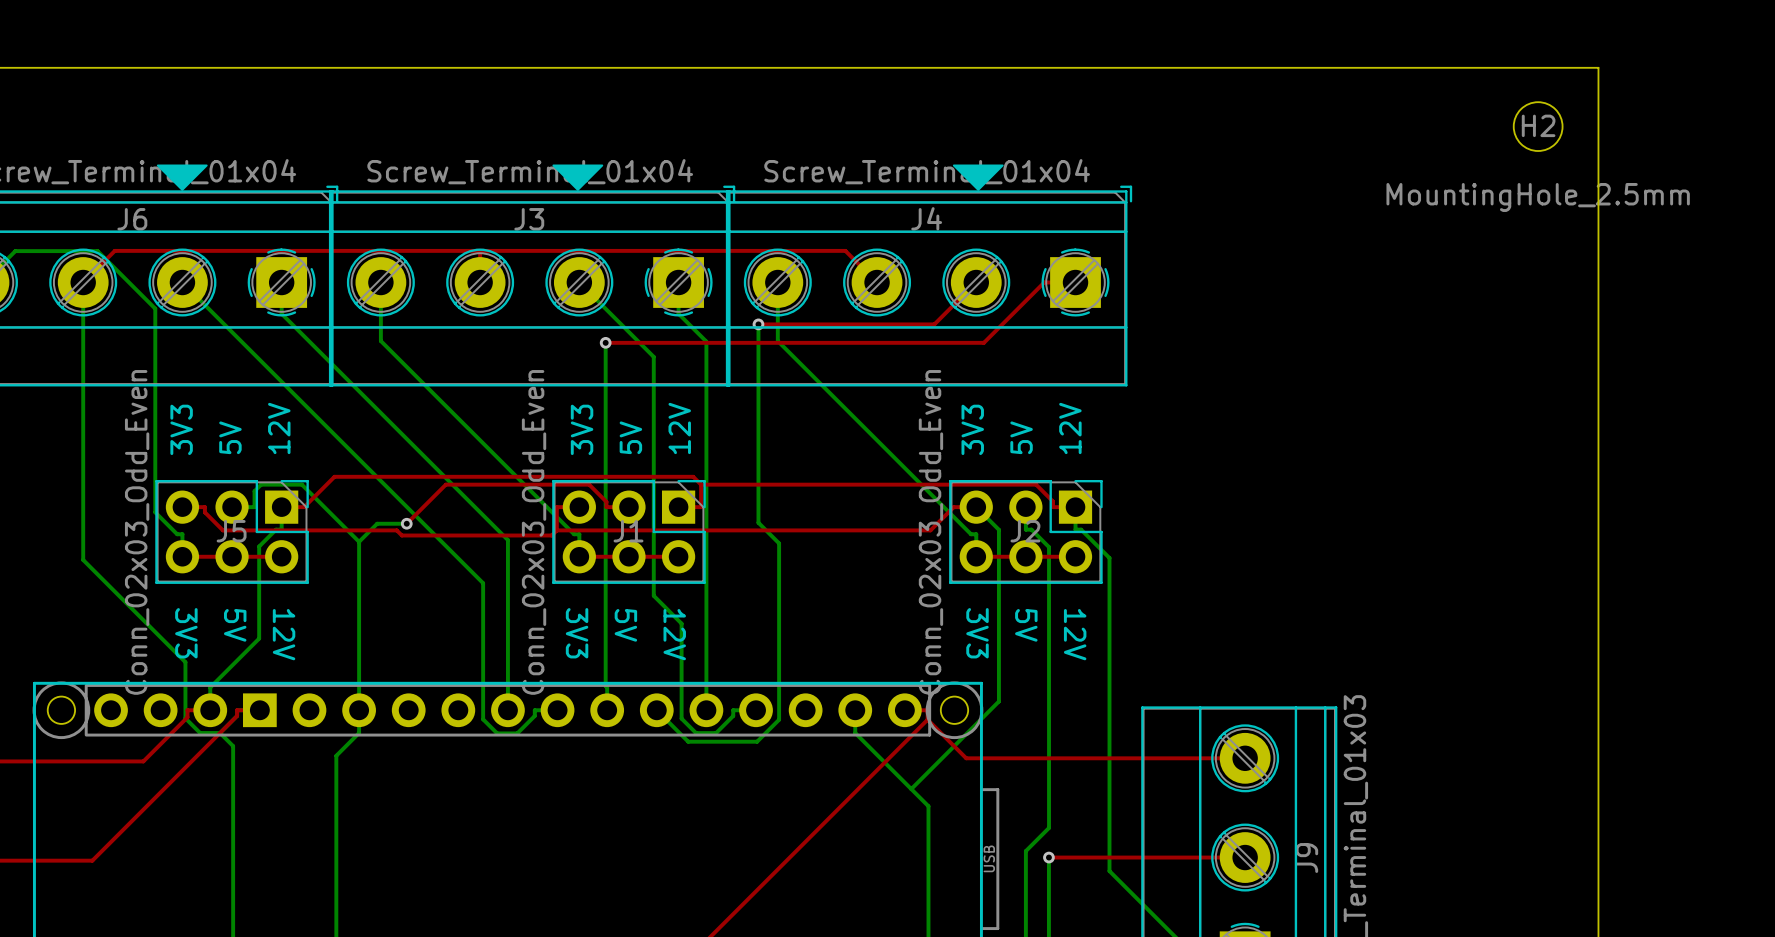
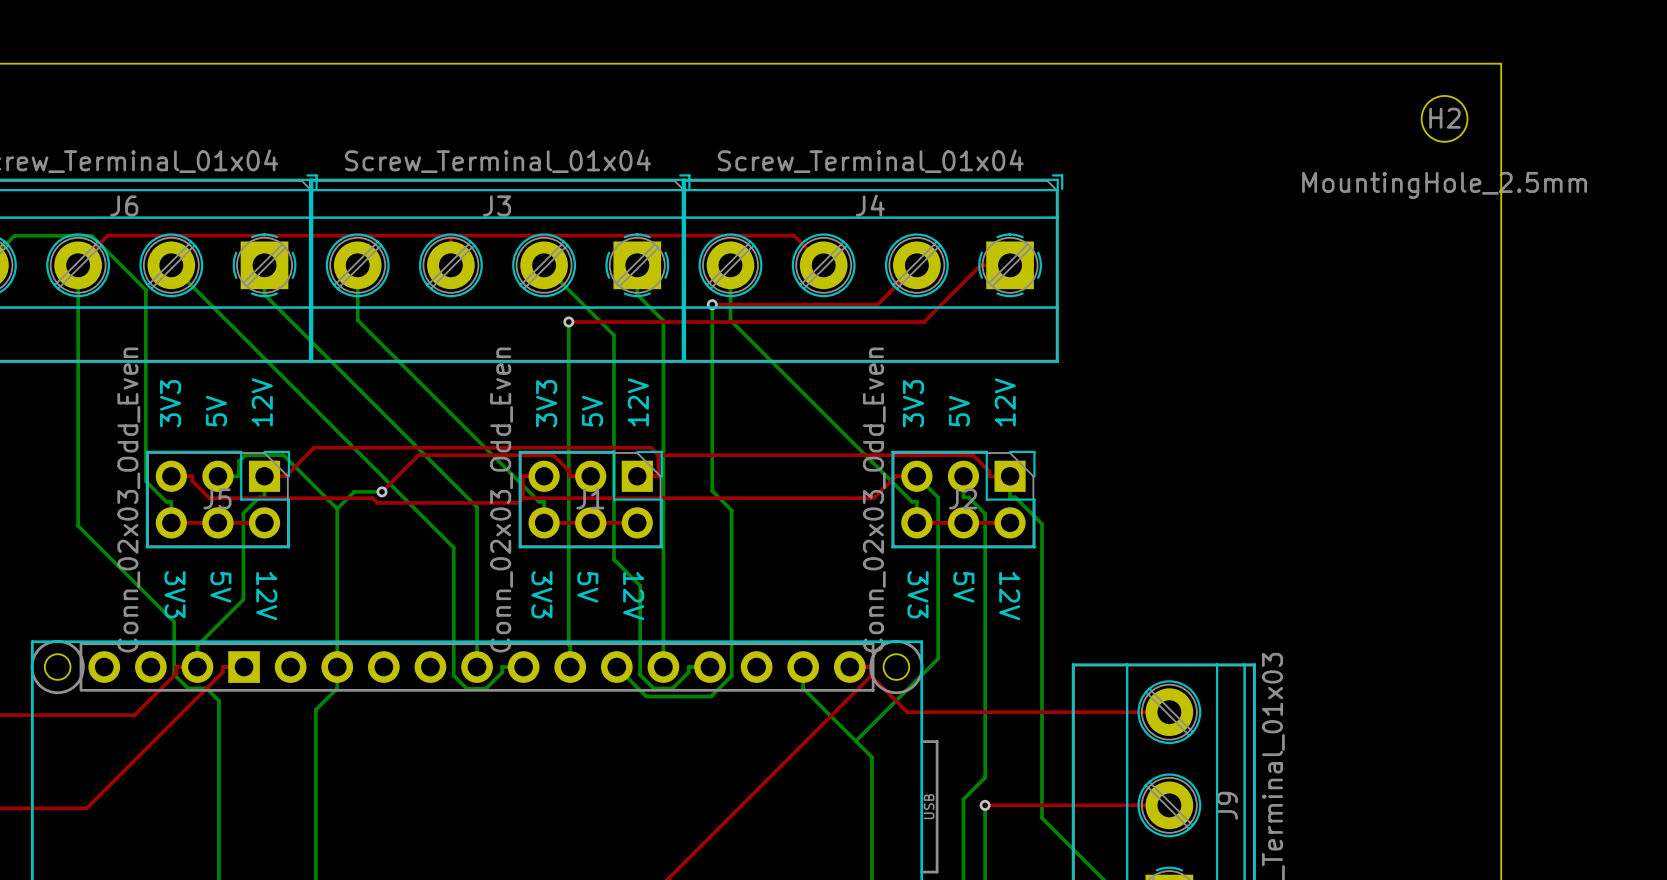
drawing: [156, 164, 208, 191] -> none
drawing: [552, 164, 604, 191] -> none
drawing: [952, 164, 1004, 191] -> none

